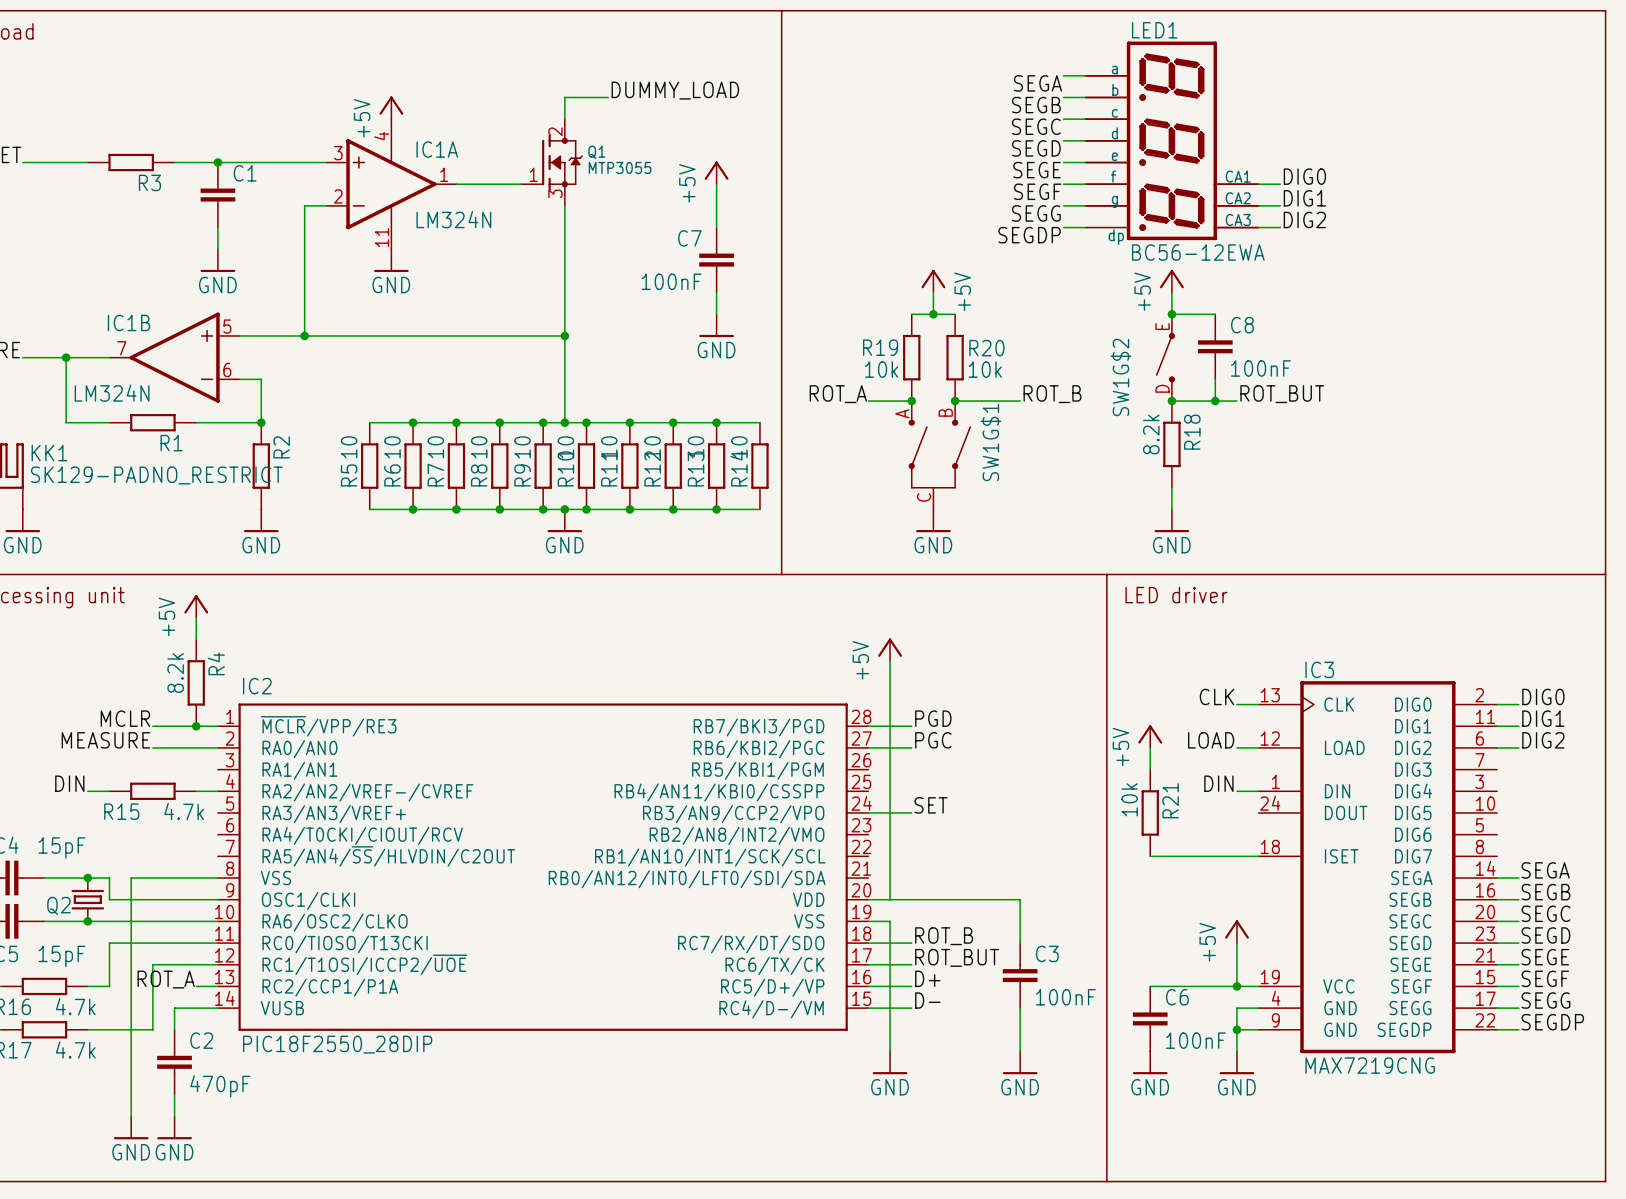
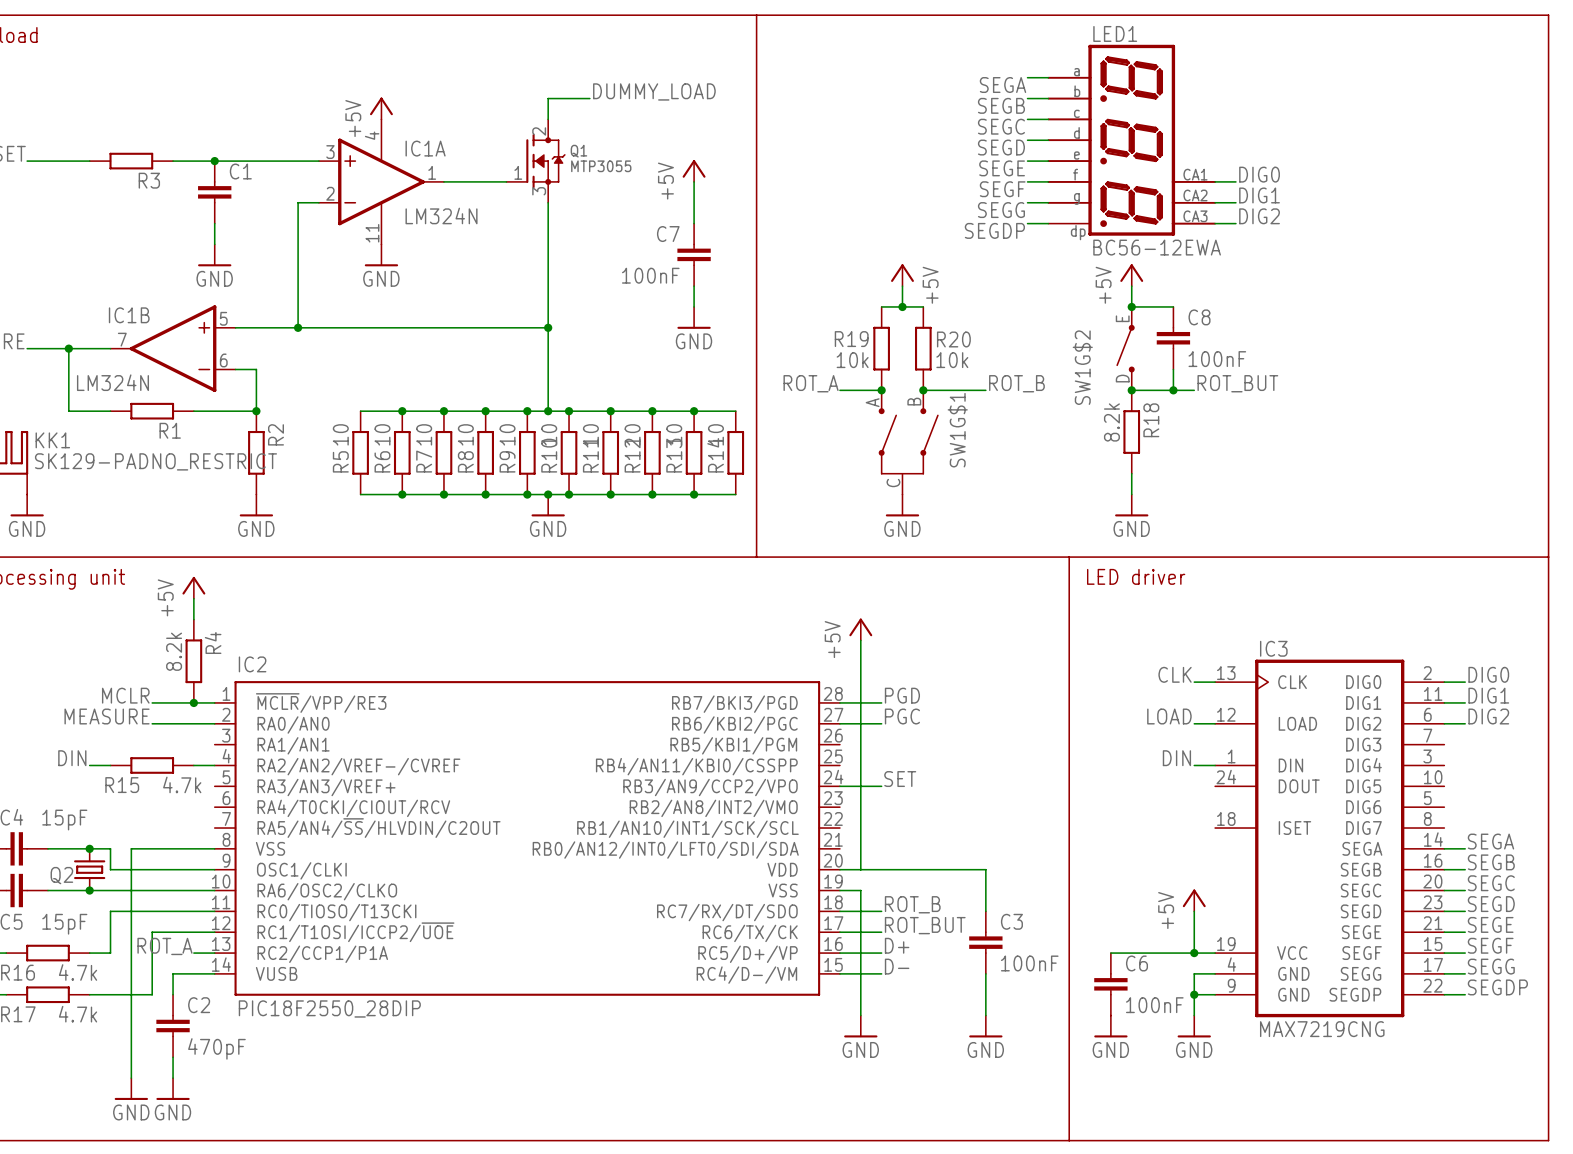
power symbol: +5V (1150, 736) -> none
wire: (1150, 747) (1150, 769) -> none
R21: 10k (1150, 812) -> none
wire: (1150, 856) (1258, 856) -> none

